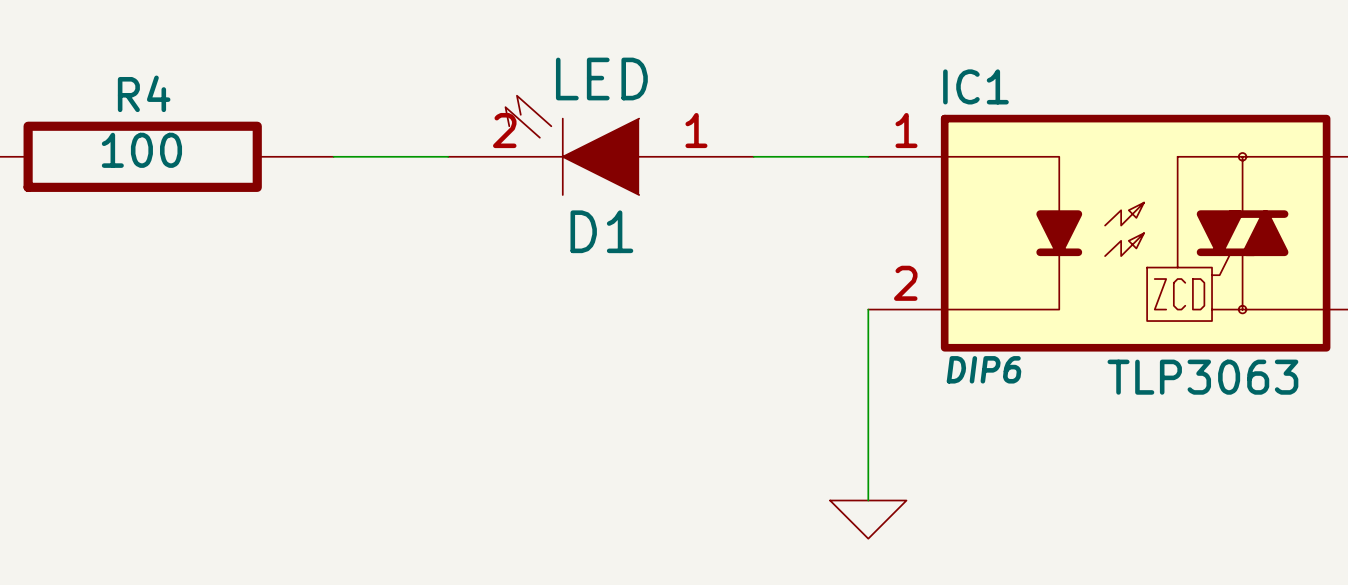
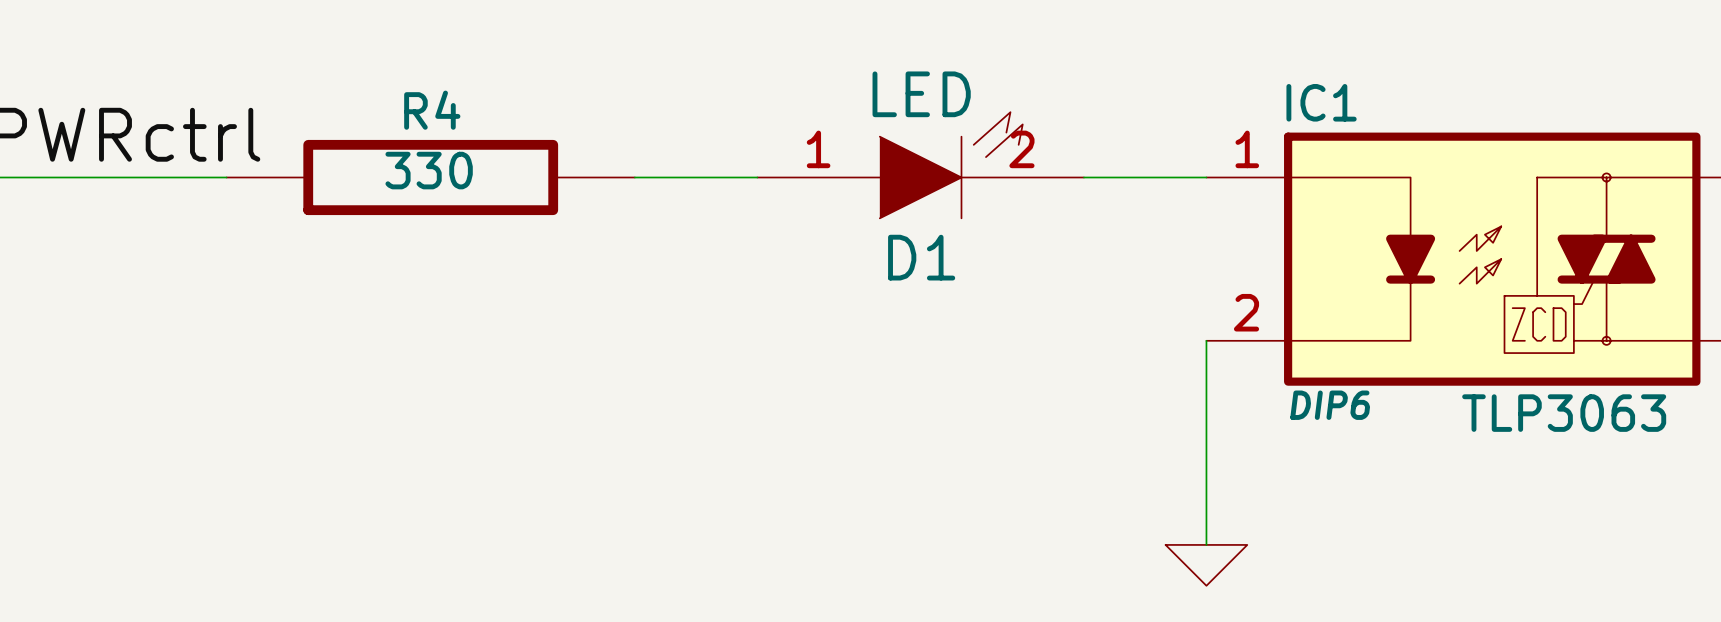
D1 flip: as is (572, 145) -> left-right (951, 165)
R4 value: 100 (141, 150) -> 330 (429, 170)

